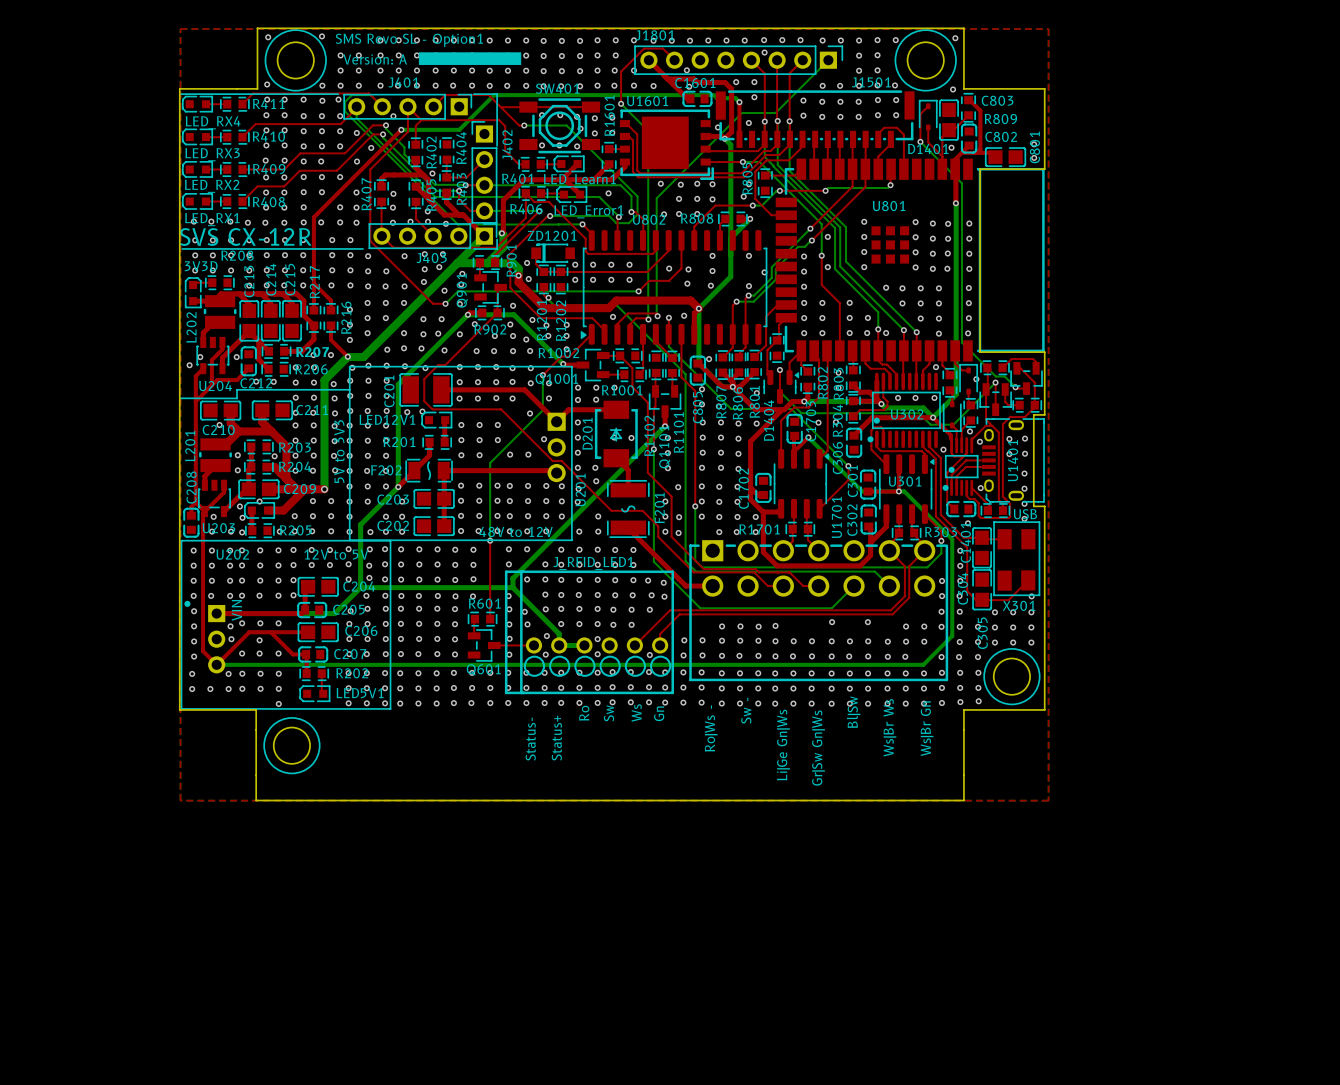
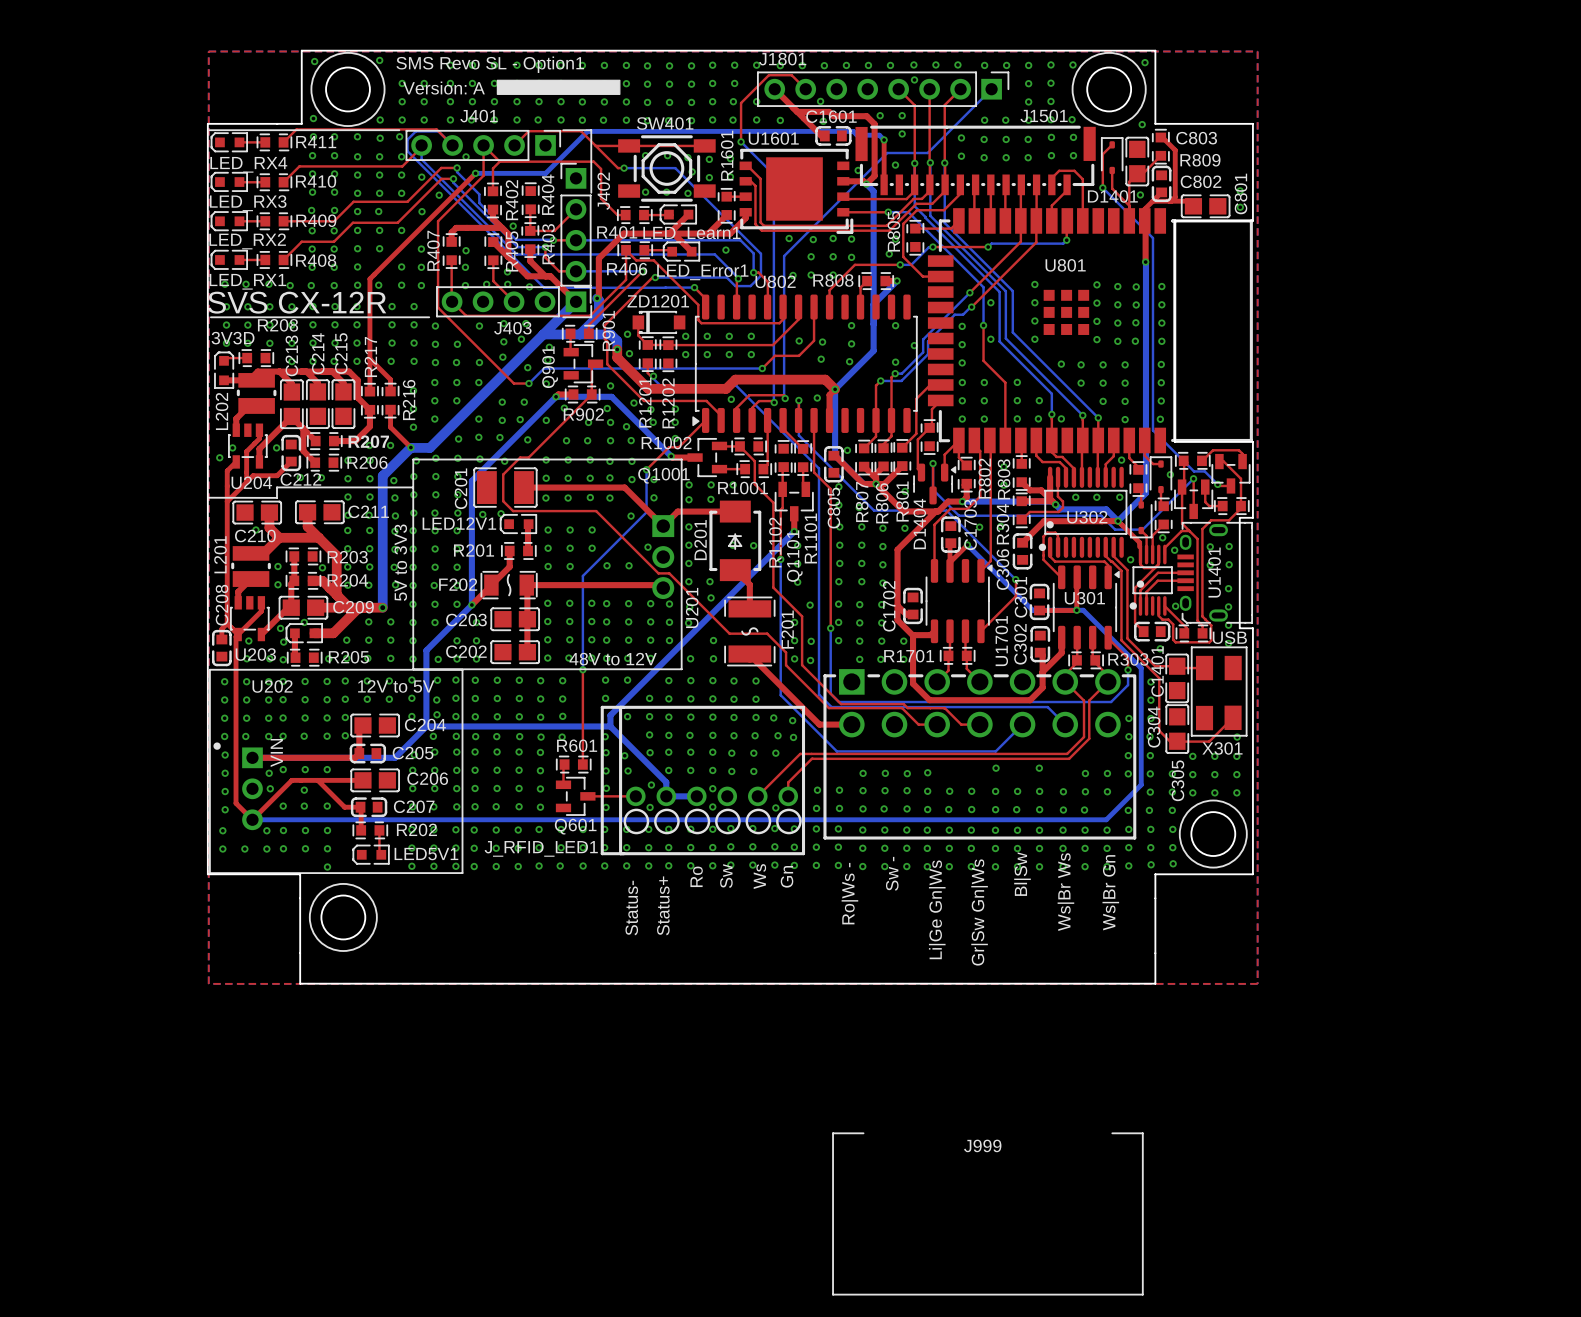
J_RFID_LED1 name position: J_RFID_LED1 (593, 563) -> J_RFID_LED1 (541, 848)
J999: none -> (987, 1213)

